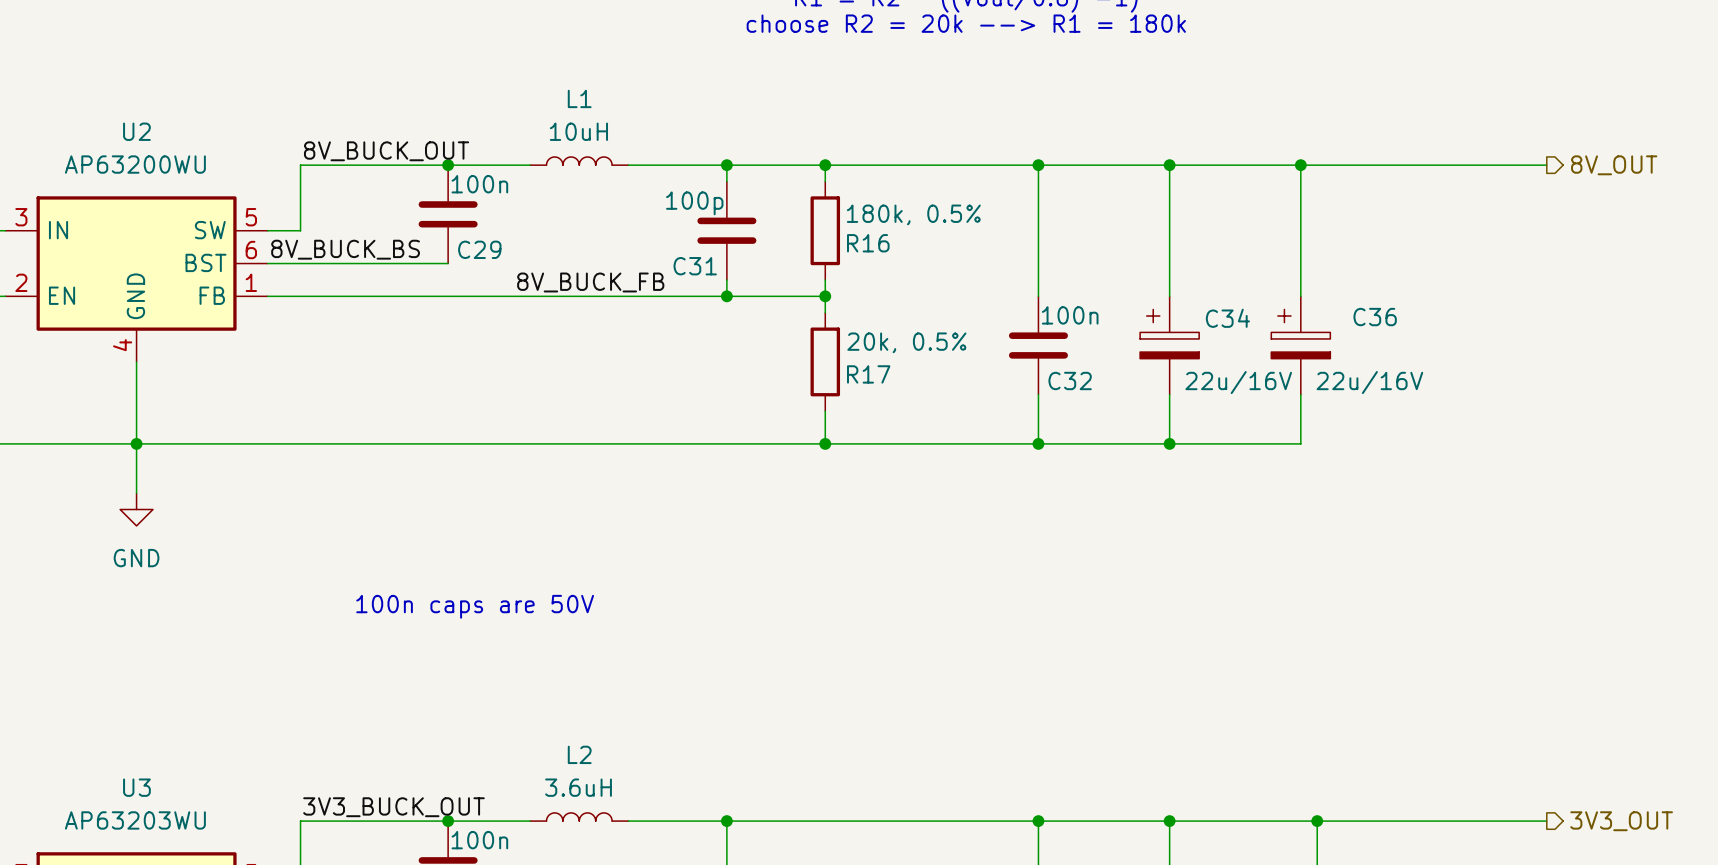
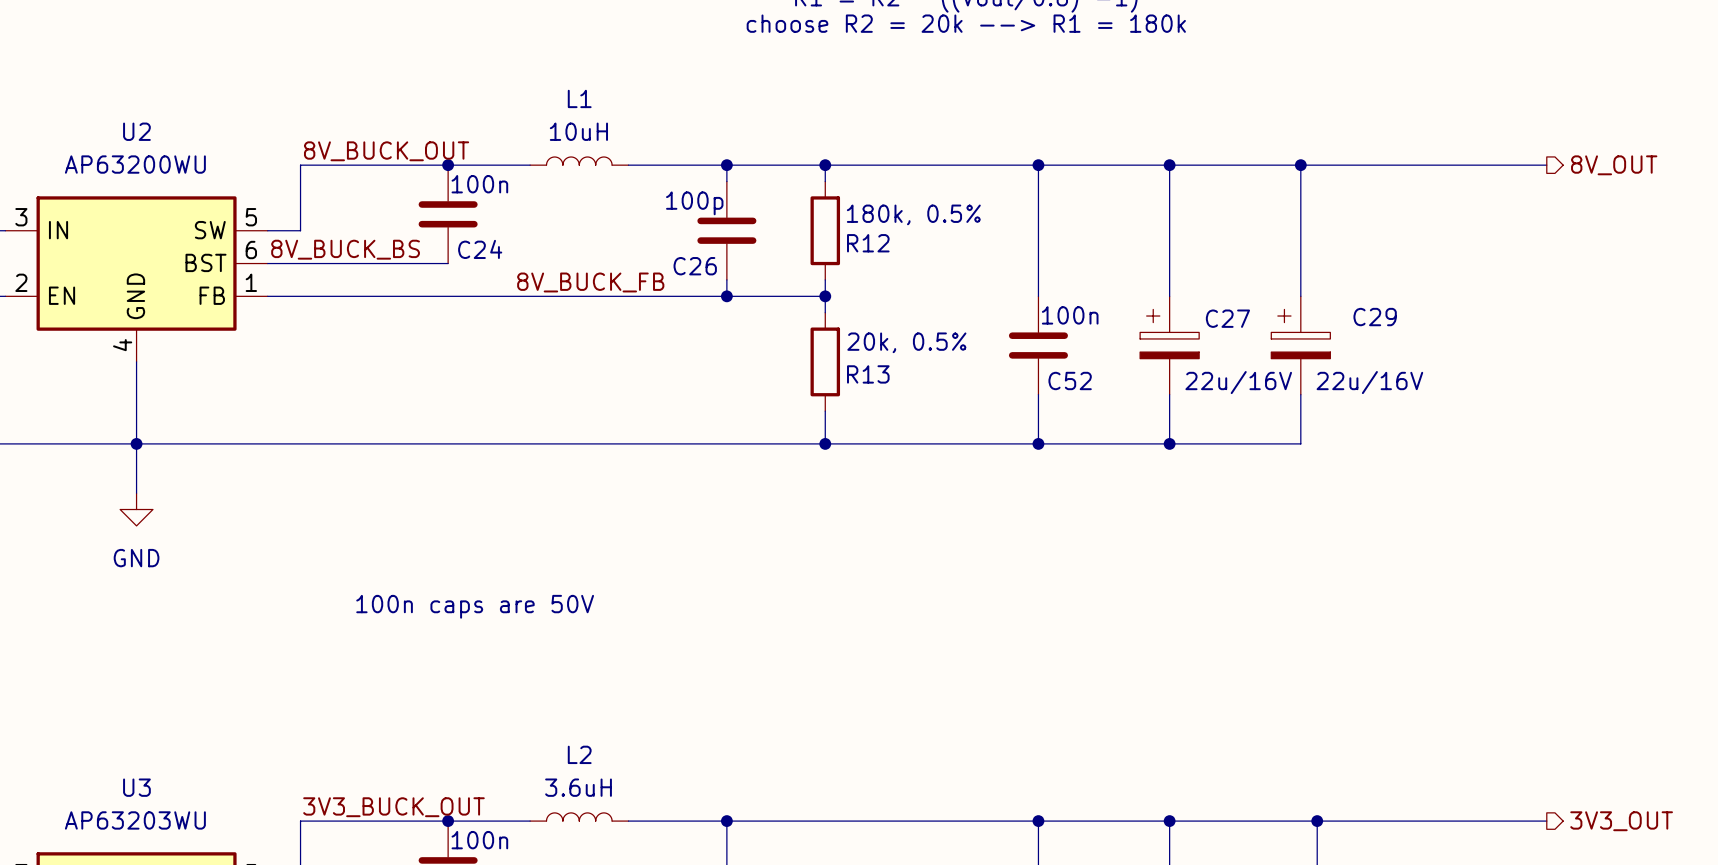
R16 name: R16 (868, 243) -> R12 (868, 243)
C29 name: C29 (479, 249) -> C24 (480, 249)
C31 name: C31 (695, 266) -> C26 (695, 266)
C36 name: C36 (1375, 317) -> C29 (1375, 317)
C34 name: C34 (1227, 318) -> C27 (1227, 318)
R17 name: R17 (868, 374) -> R13 (868, 374)
C32 name: C32 (1070, 380) -> C52 (1070, 380)

